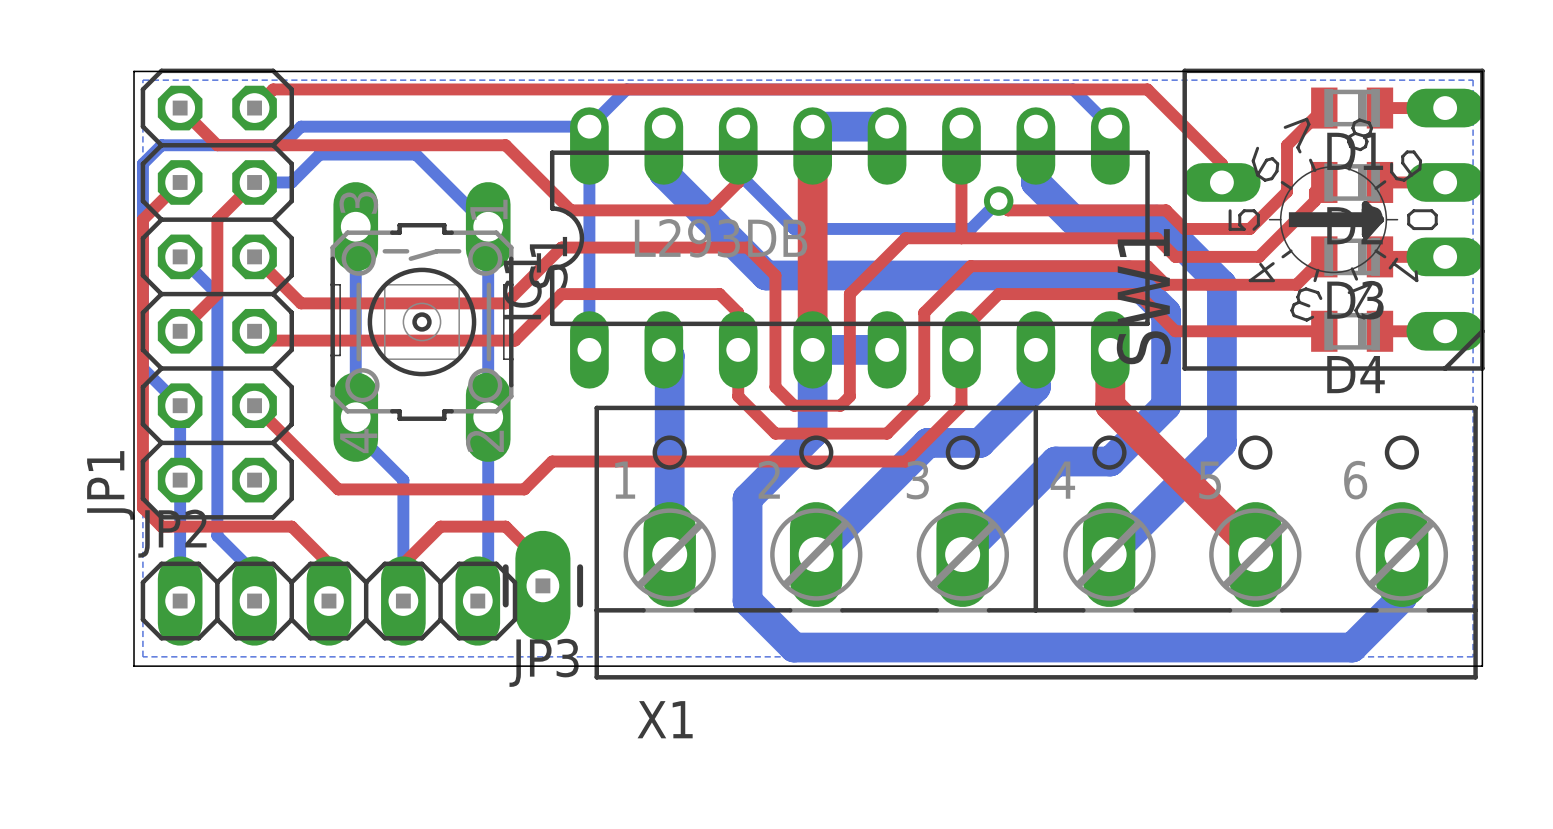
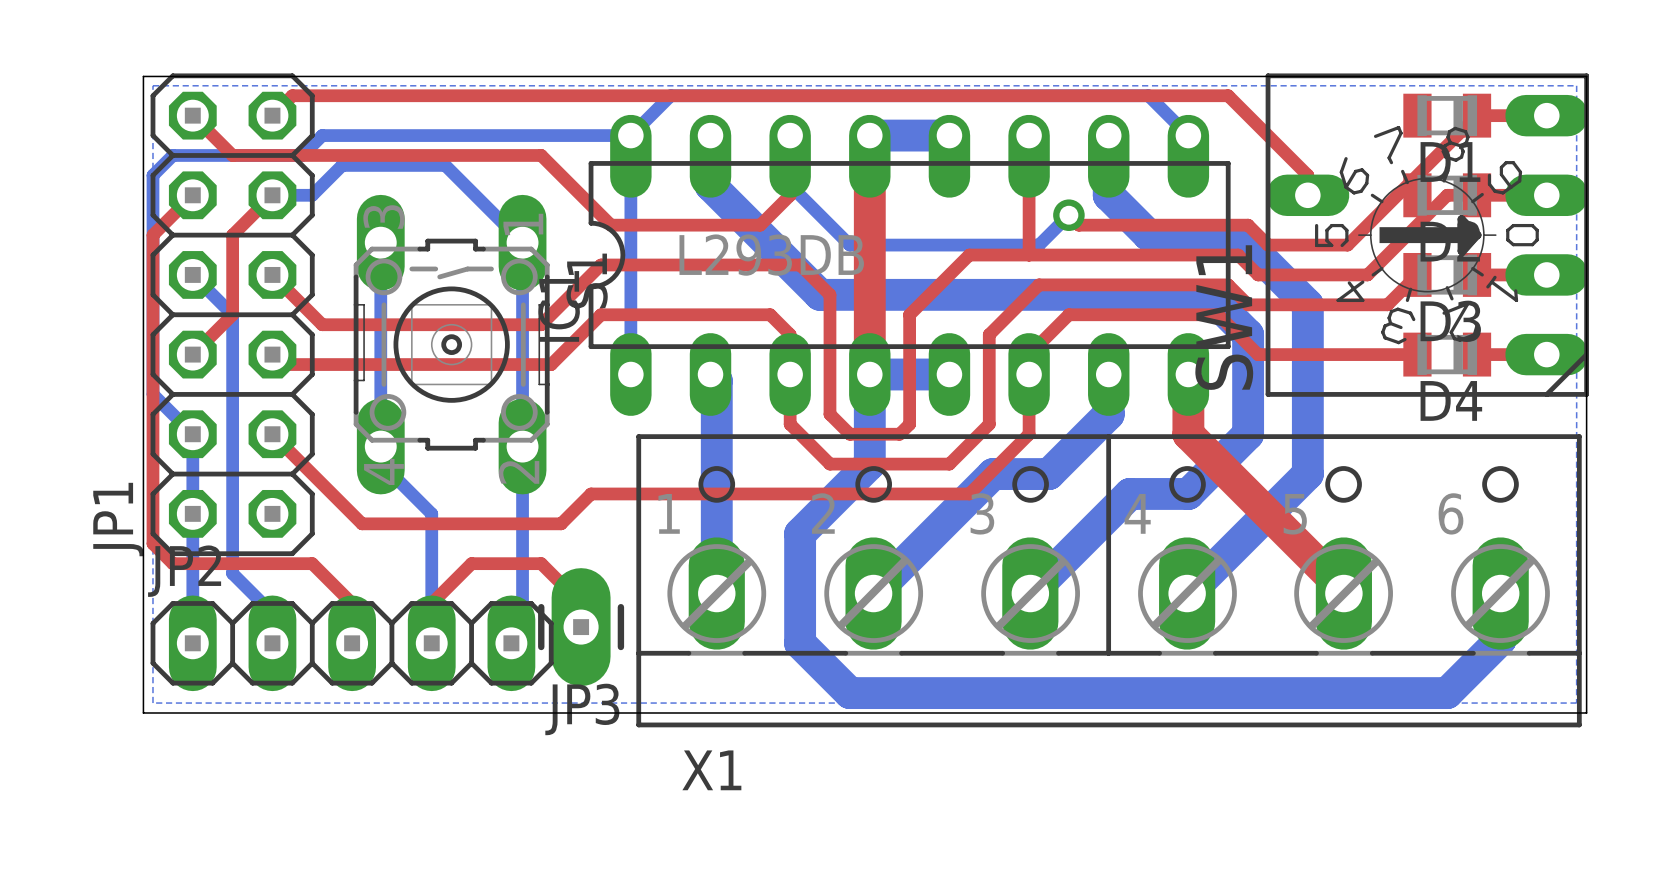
top track: (1324, 108) (1287, 145) (1287, 191) (1249, 228) -> (1477, 115) (1347, 245) (1337, 245)
top track: (1324, 182) (1314, 191) (1314, 201) (1259, 256) -> (1477, 195) (1447, 195) (1367, 274) (1347, 274)

